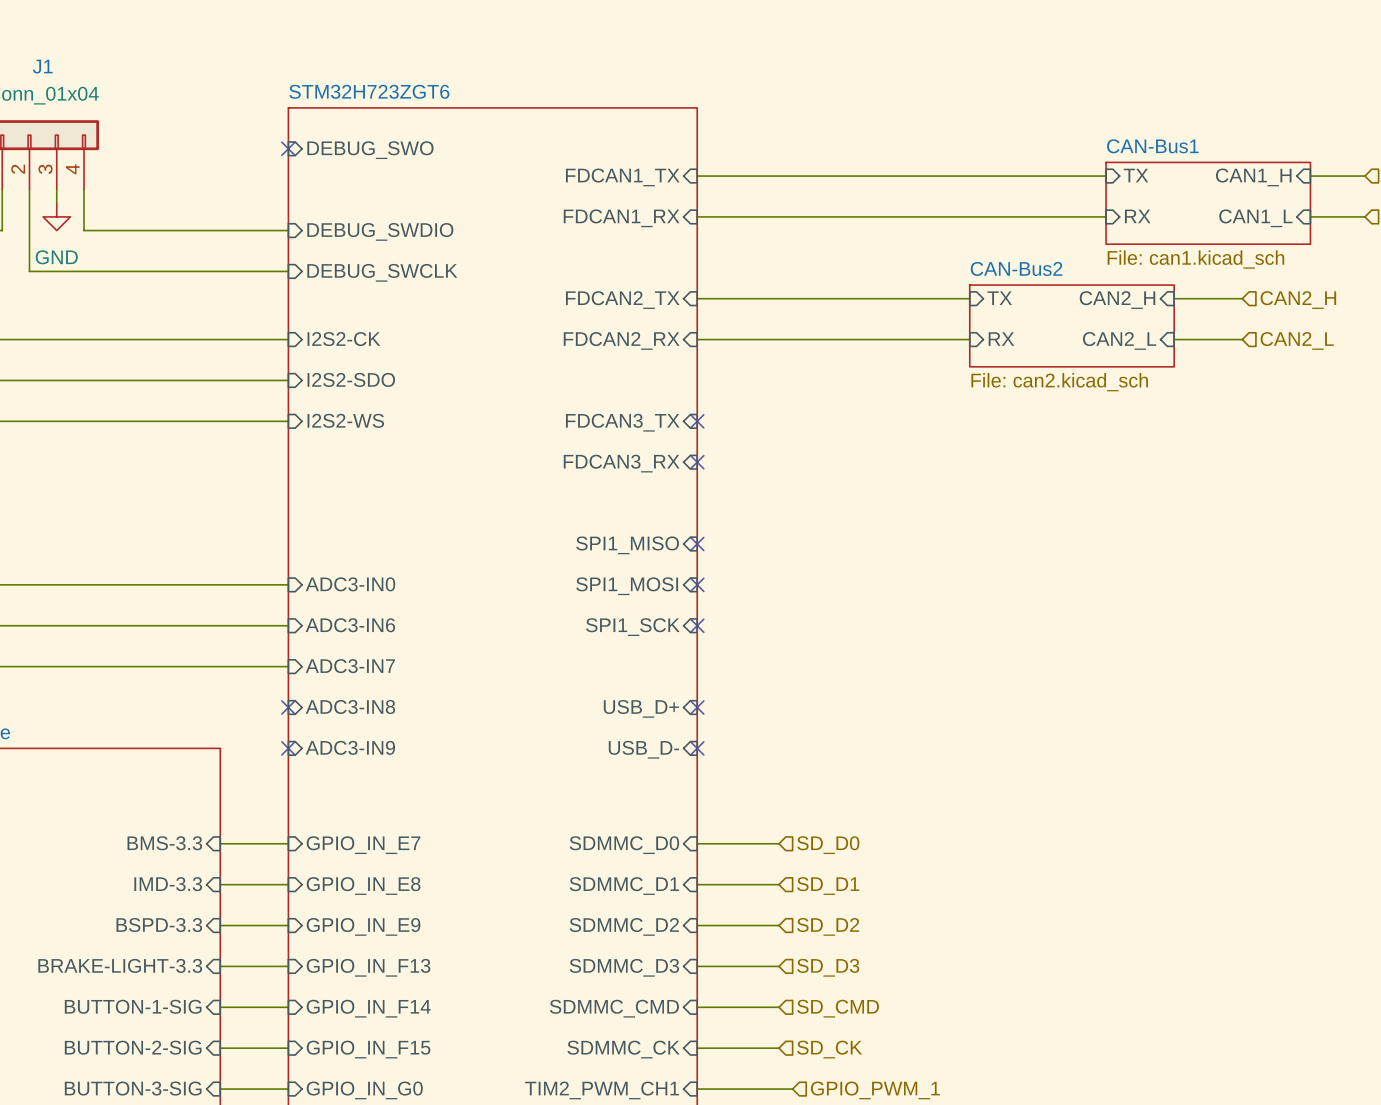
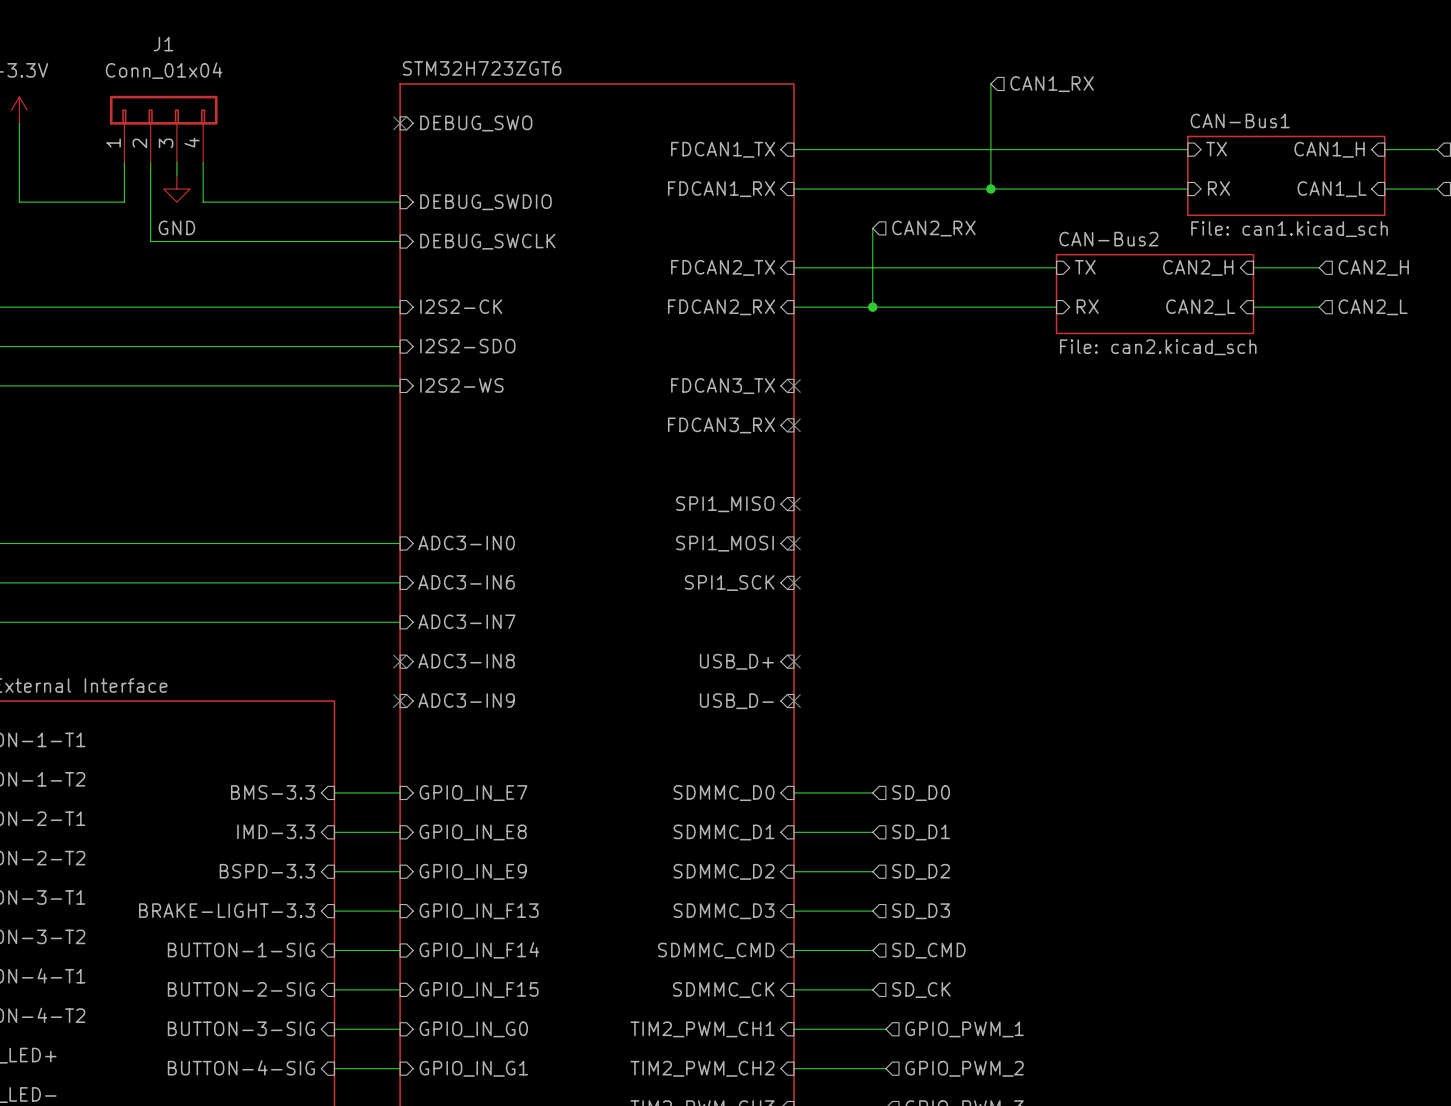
wire: none -> (990, 83) (990, 189)
hierarchical label: none -> CAN1_RX (1052, 84)
junction: none -> (990, 189)
wire: none -> (872, 228) (872, 307)
hierarchical label: none -> CAN2_RX (933, 228)
junction: none -> (872, 307)

